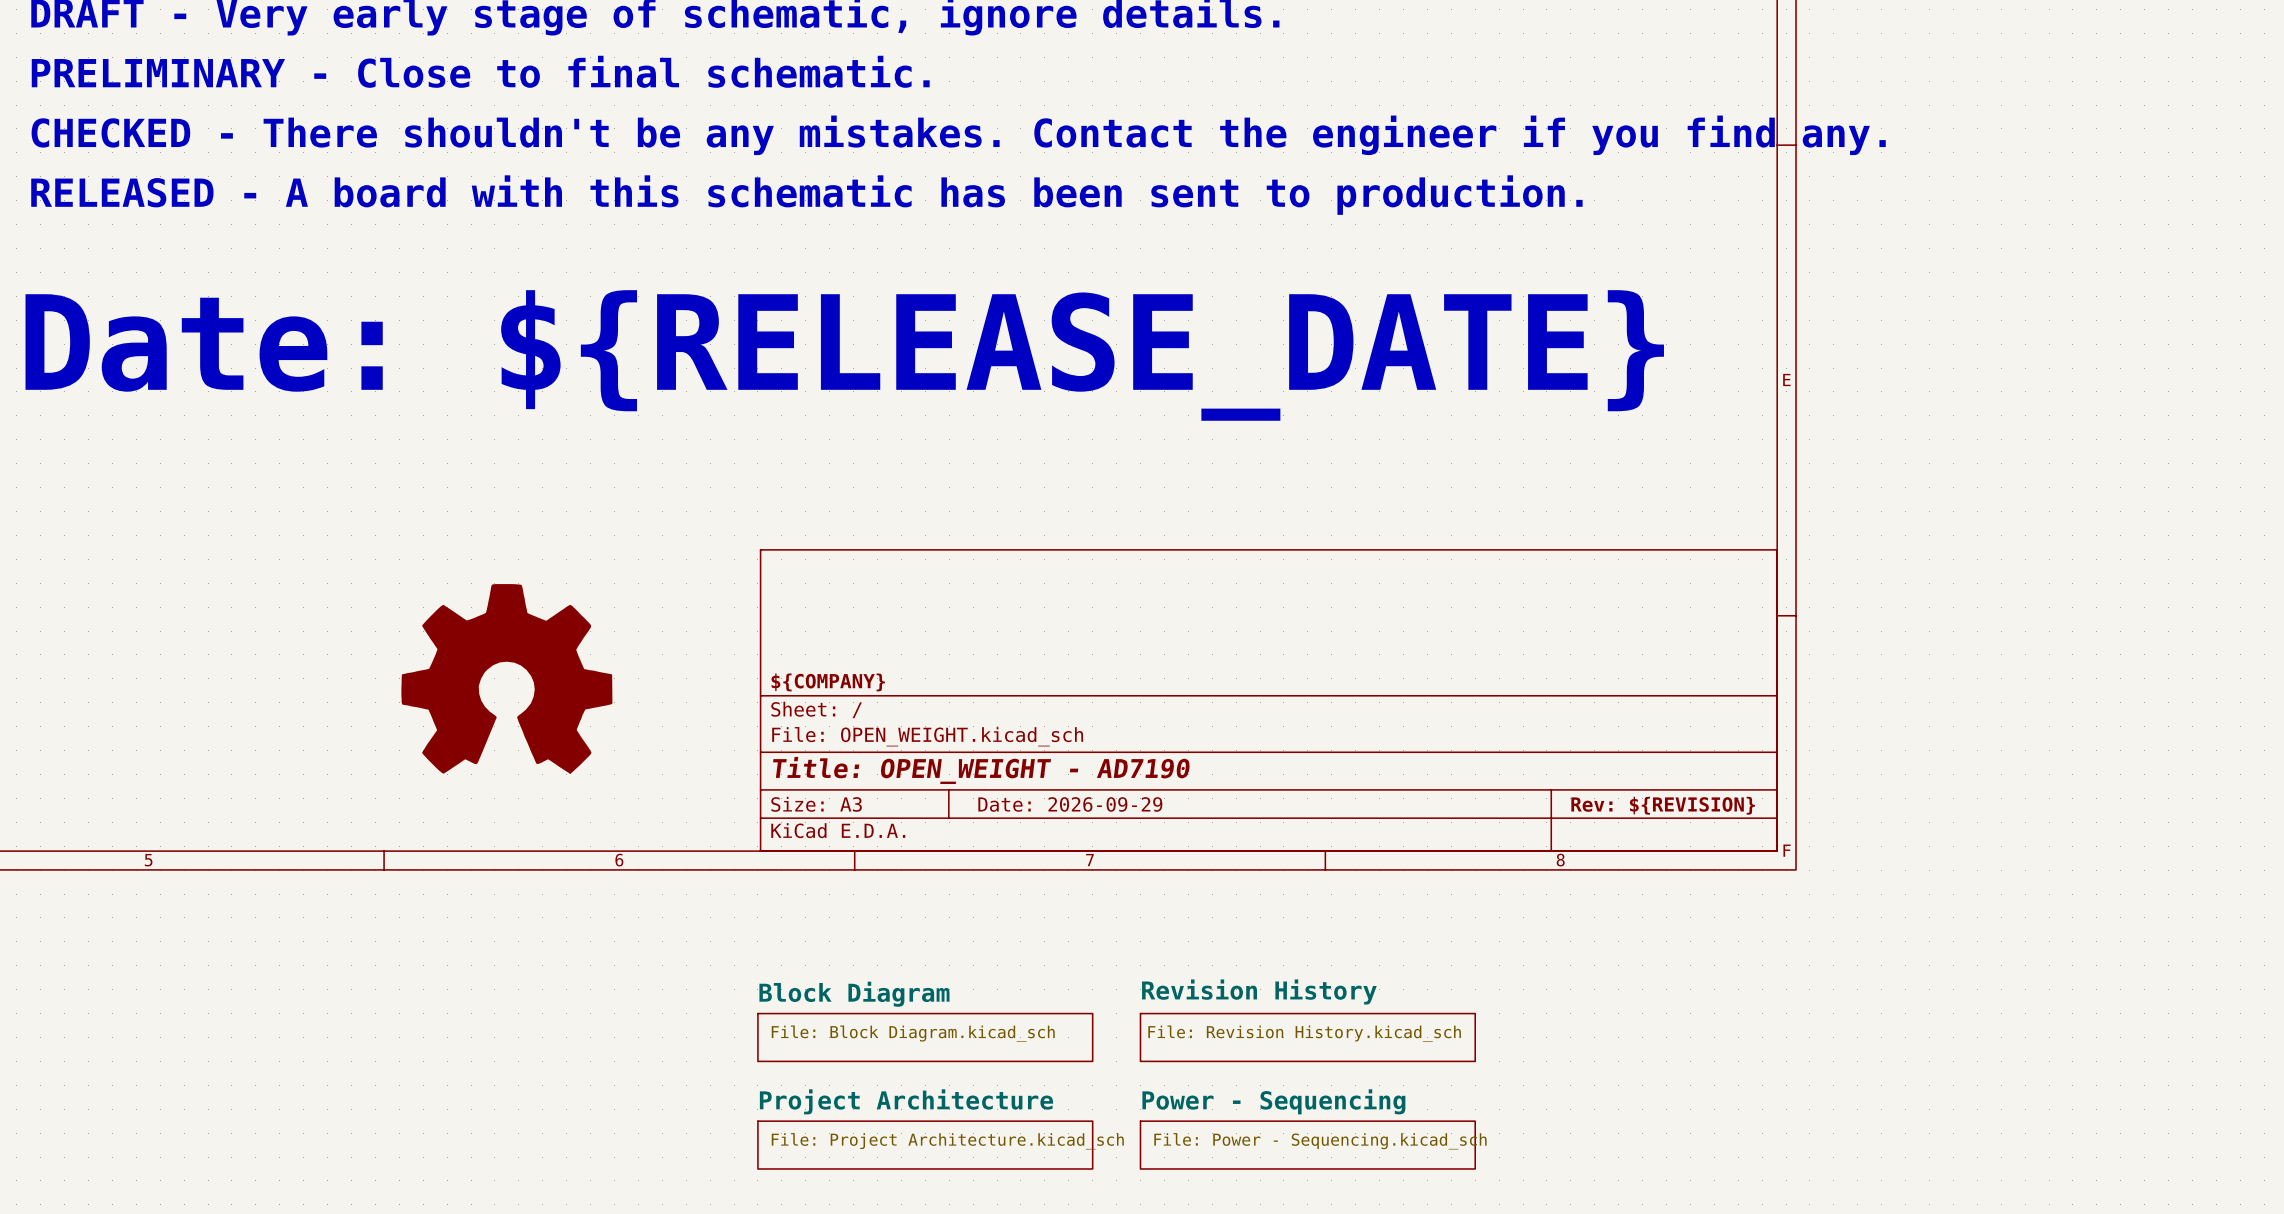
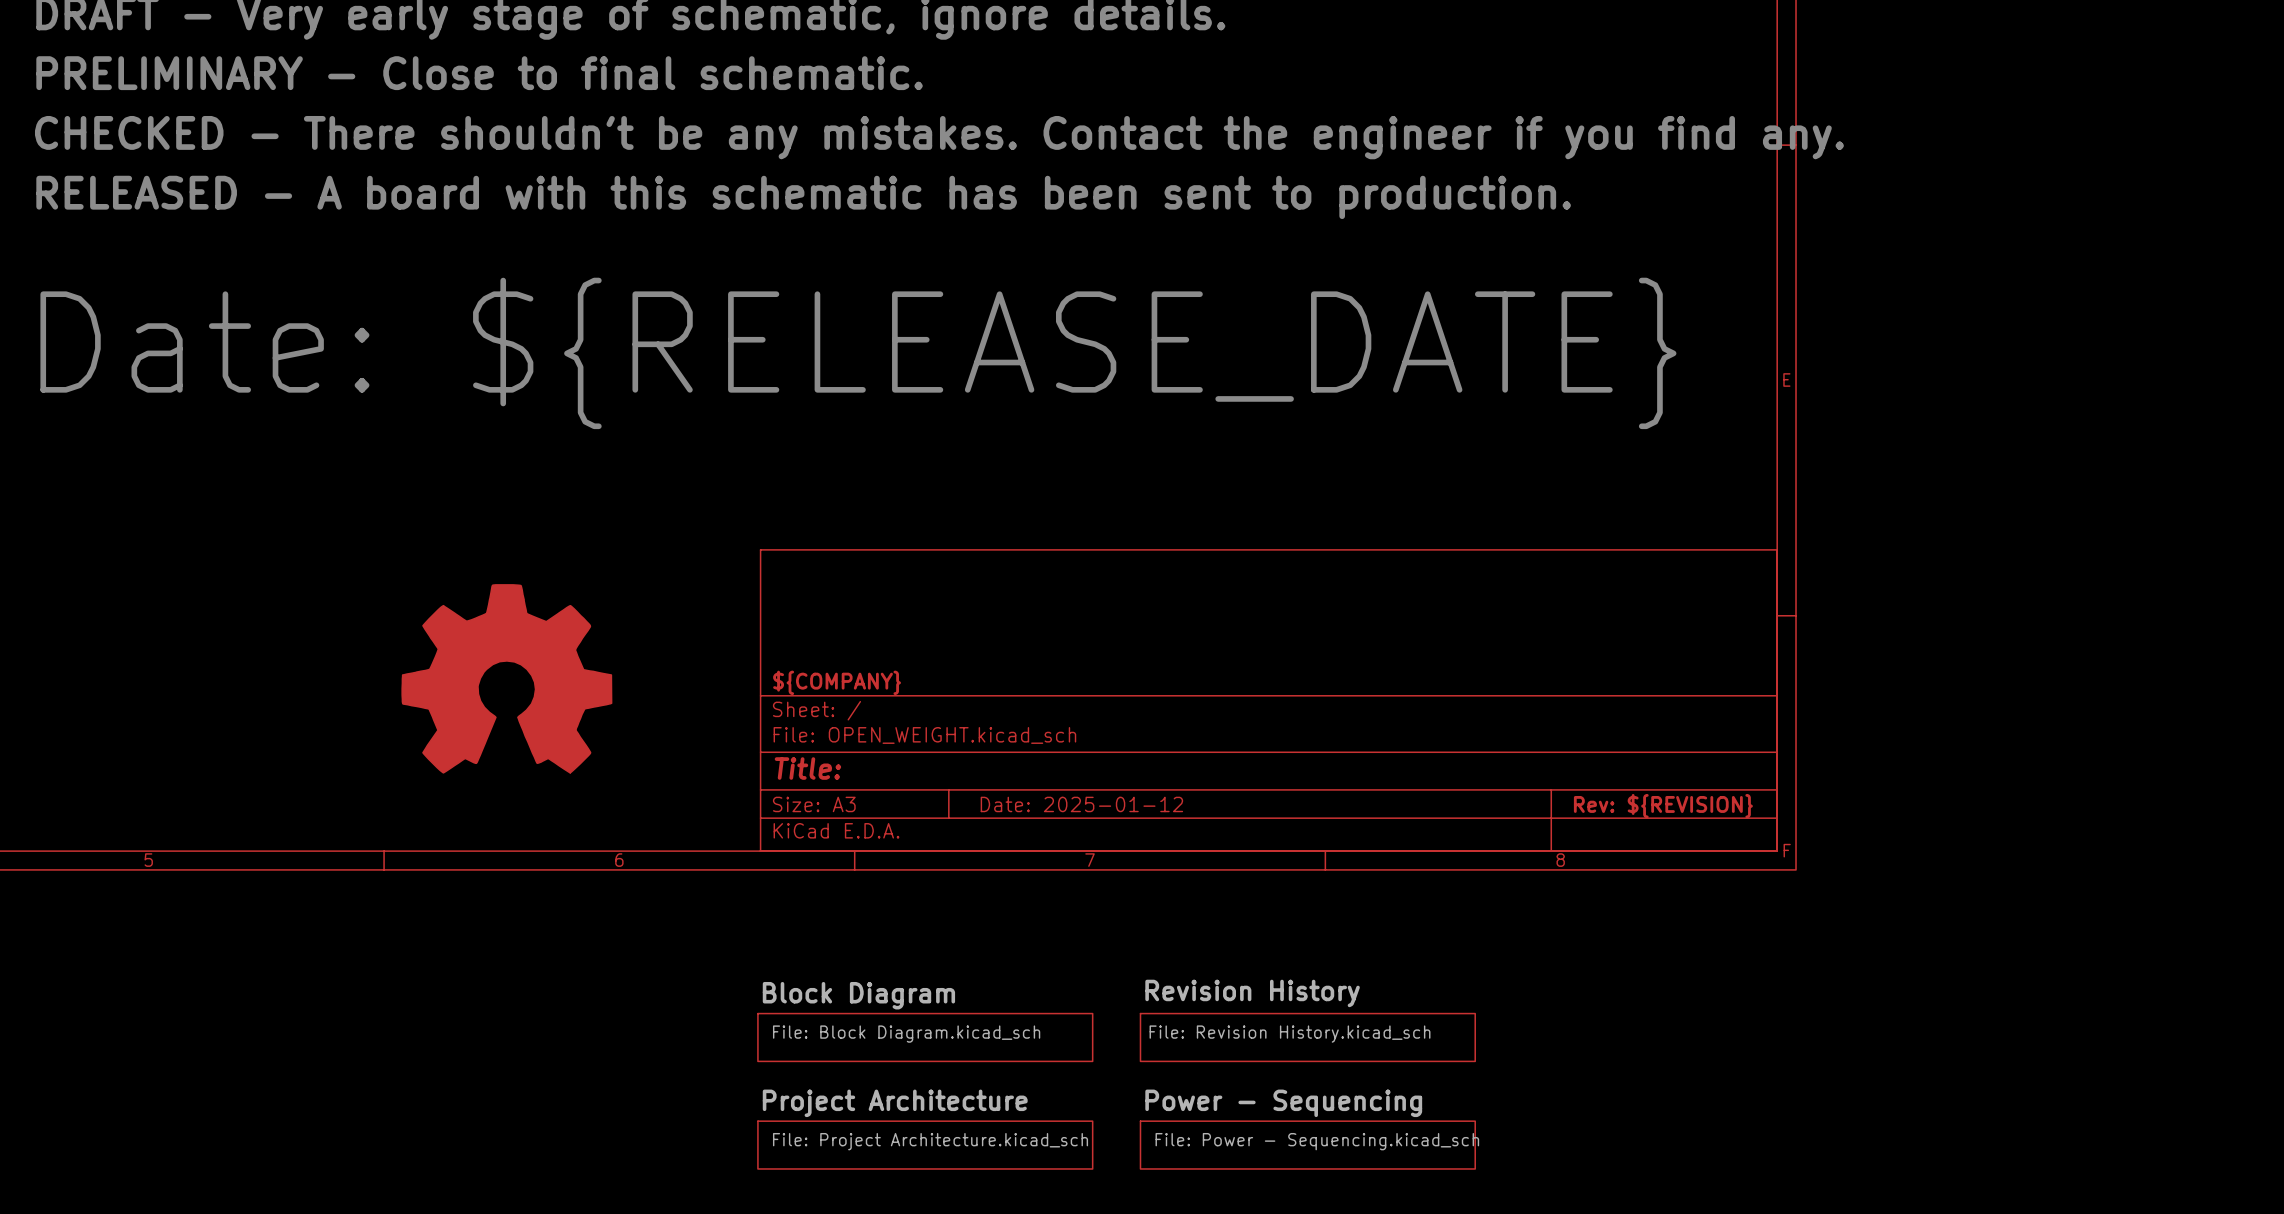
title block: Title: OPEN_WEIGHT - AD7190 (981, 770) -> Title: (807, 768)
title block: Date: 2026-09-29 (1070, 804) -> Date: 2025-01-12 (1081, 804)

